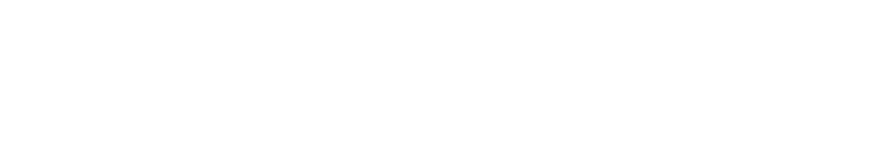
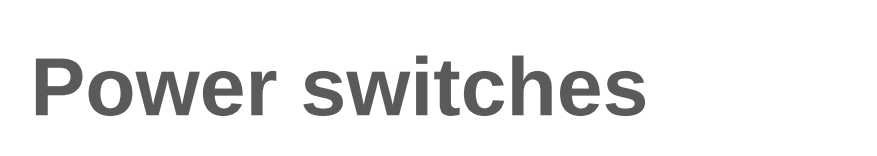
text: none -> Power switches (340, 85)

